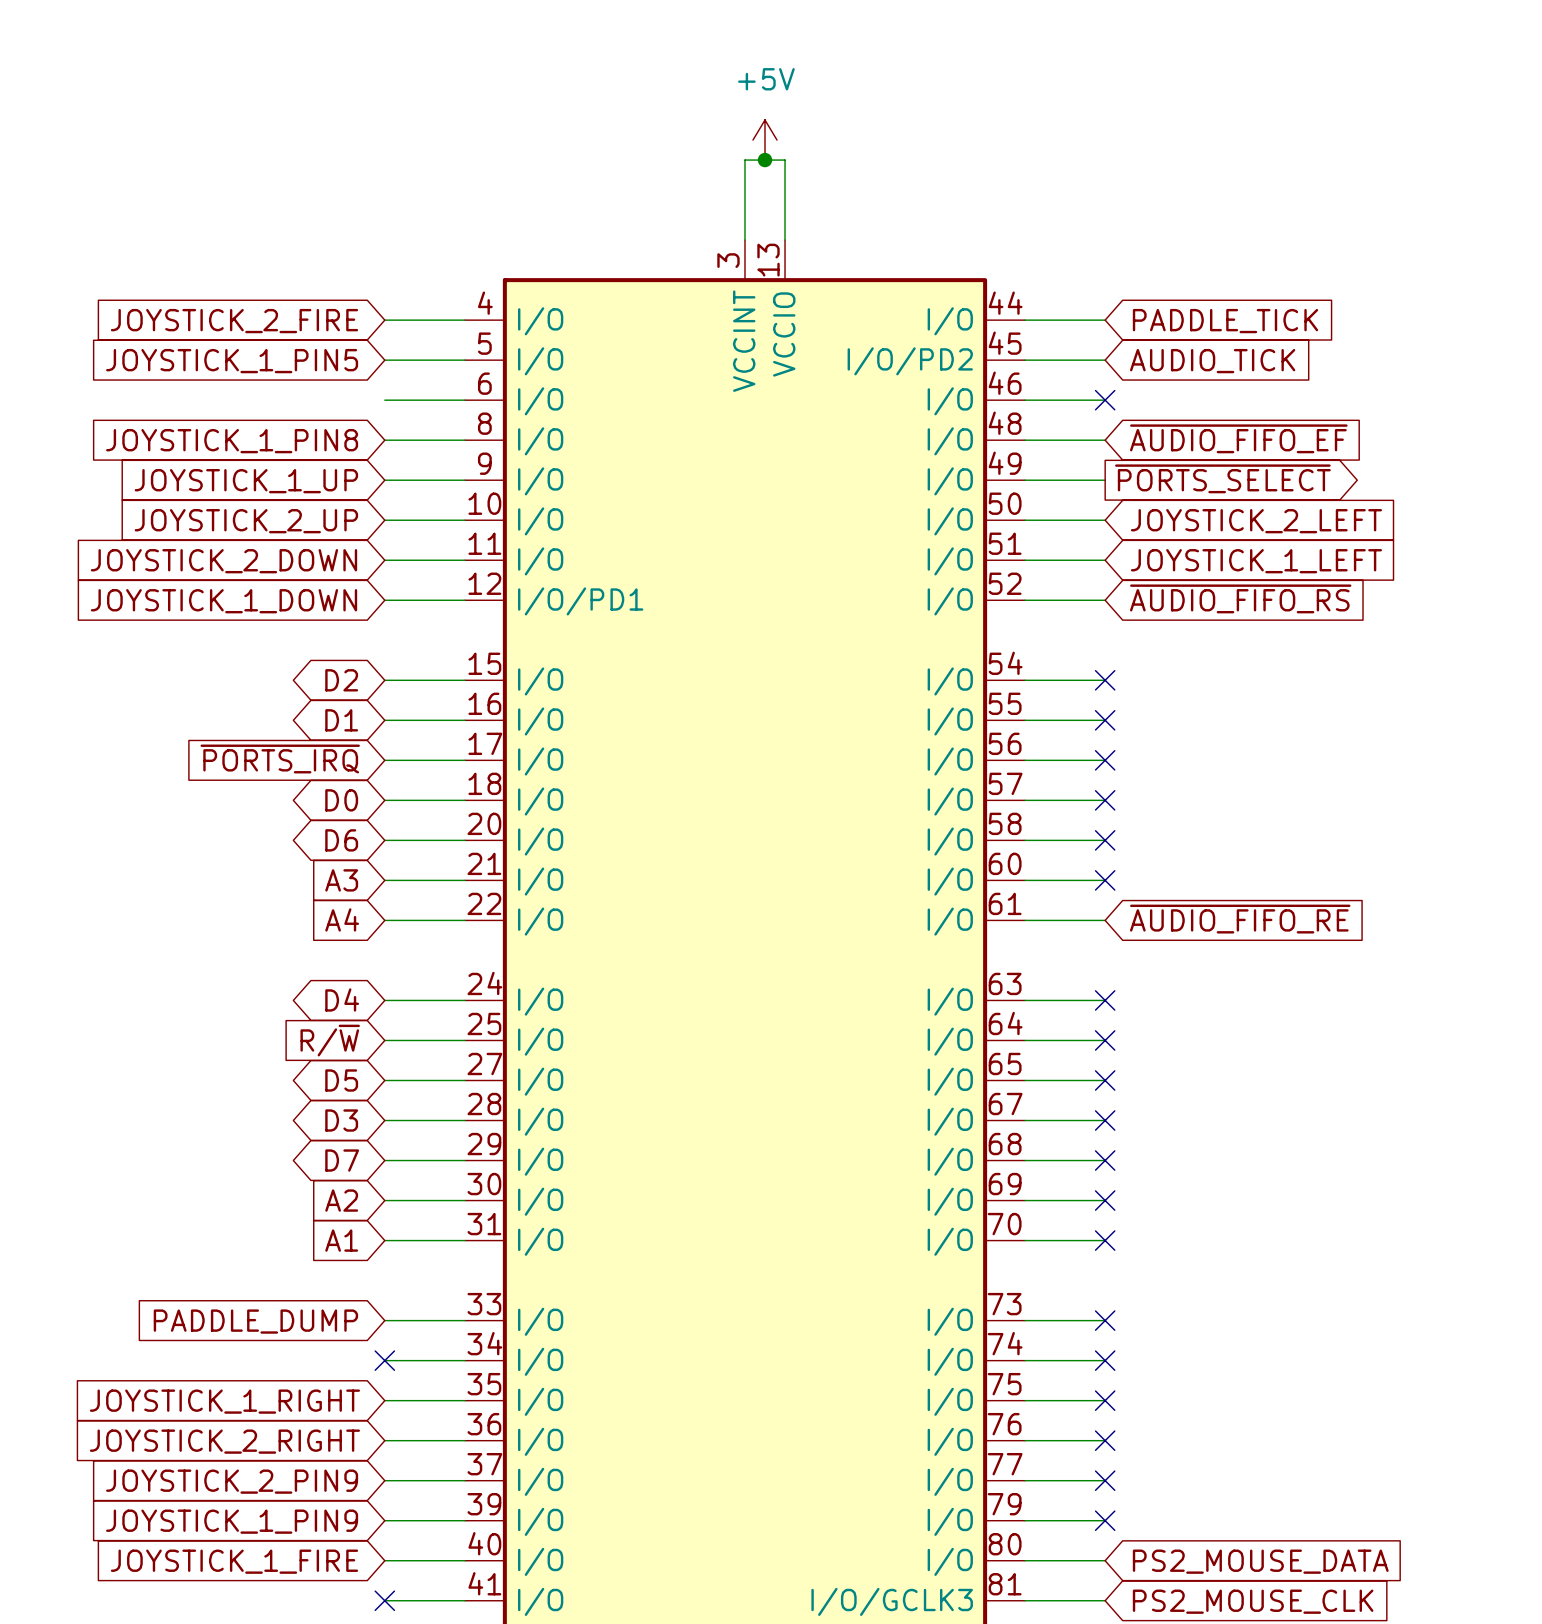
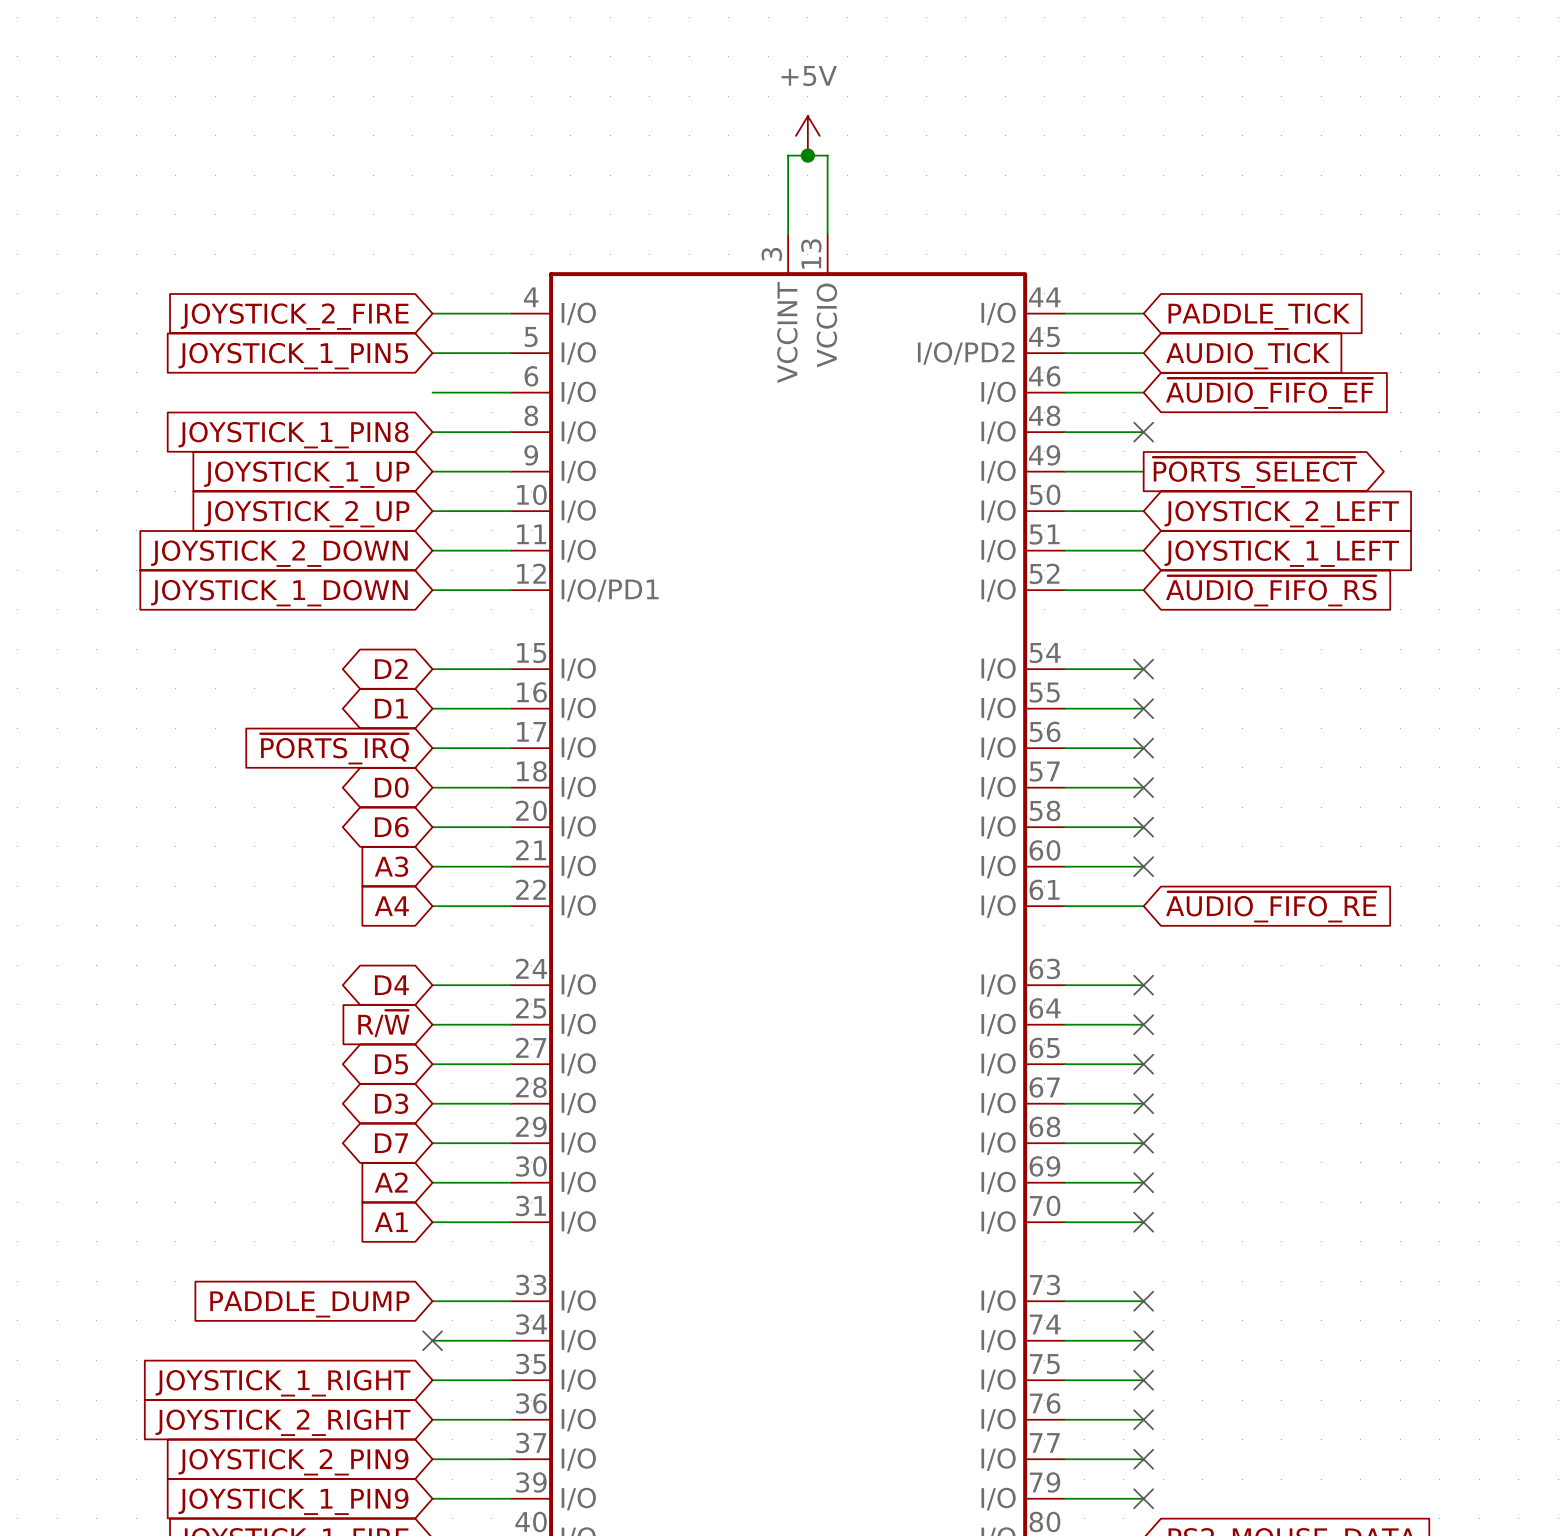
no-connect mark position: (1105, 400) -> (1143, 432)
global label position: ~{AUDIO_FIFO_EF} (1238, 438) -> ~{AUDIO_FIFO_EF} (1269, 393)

